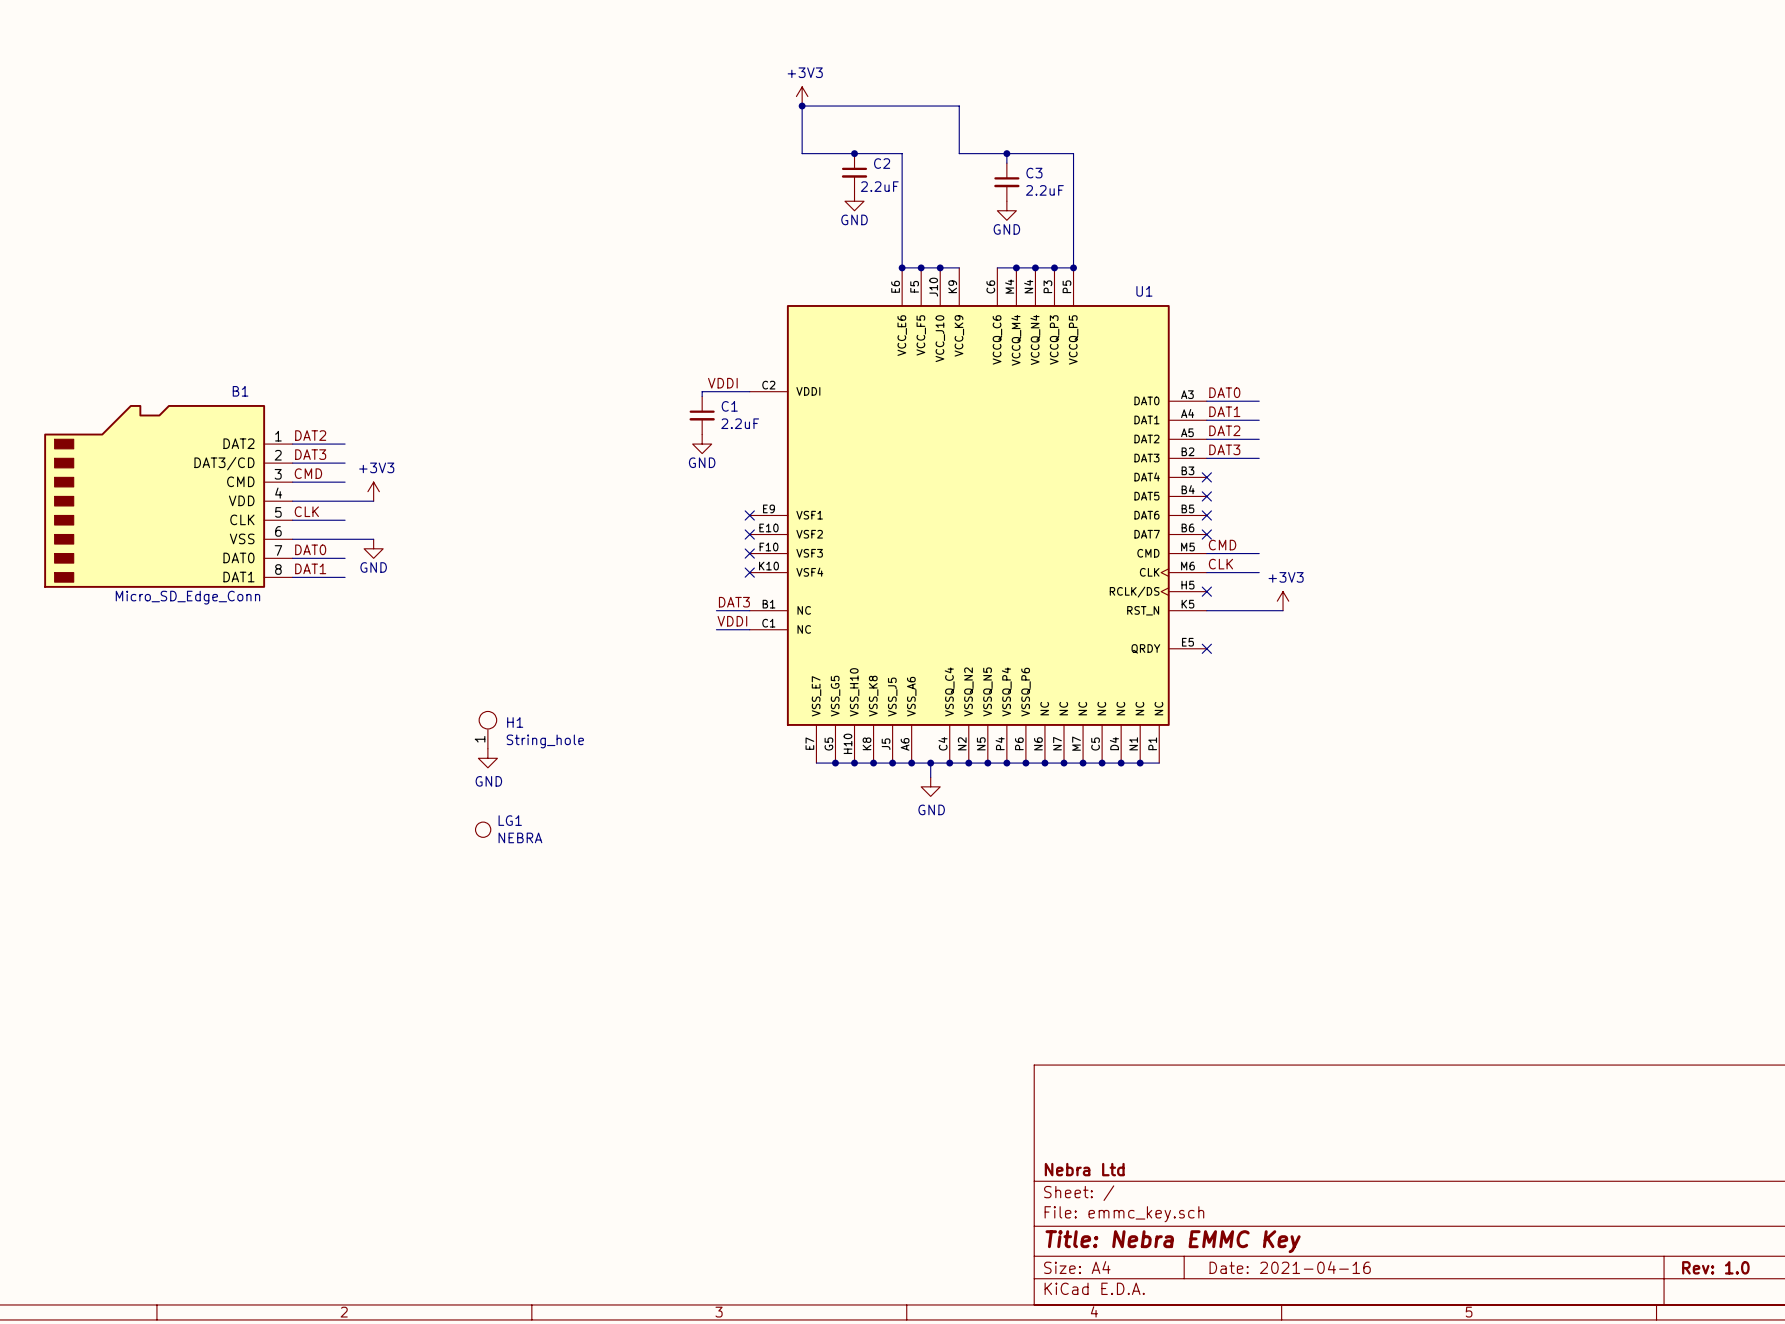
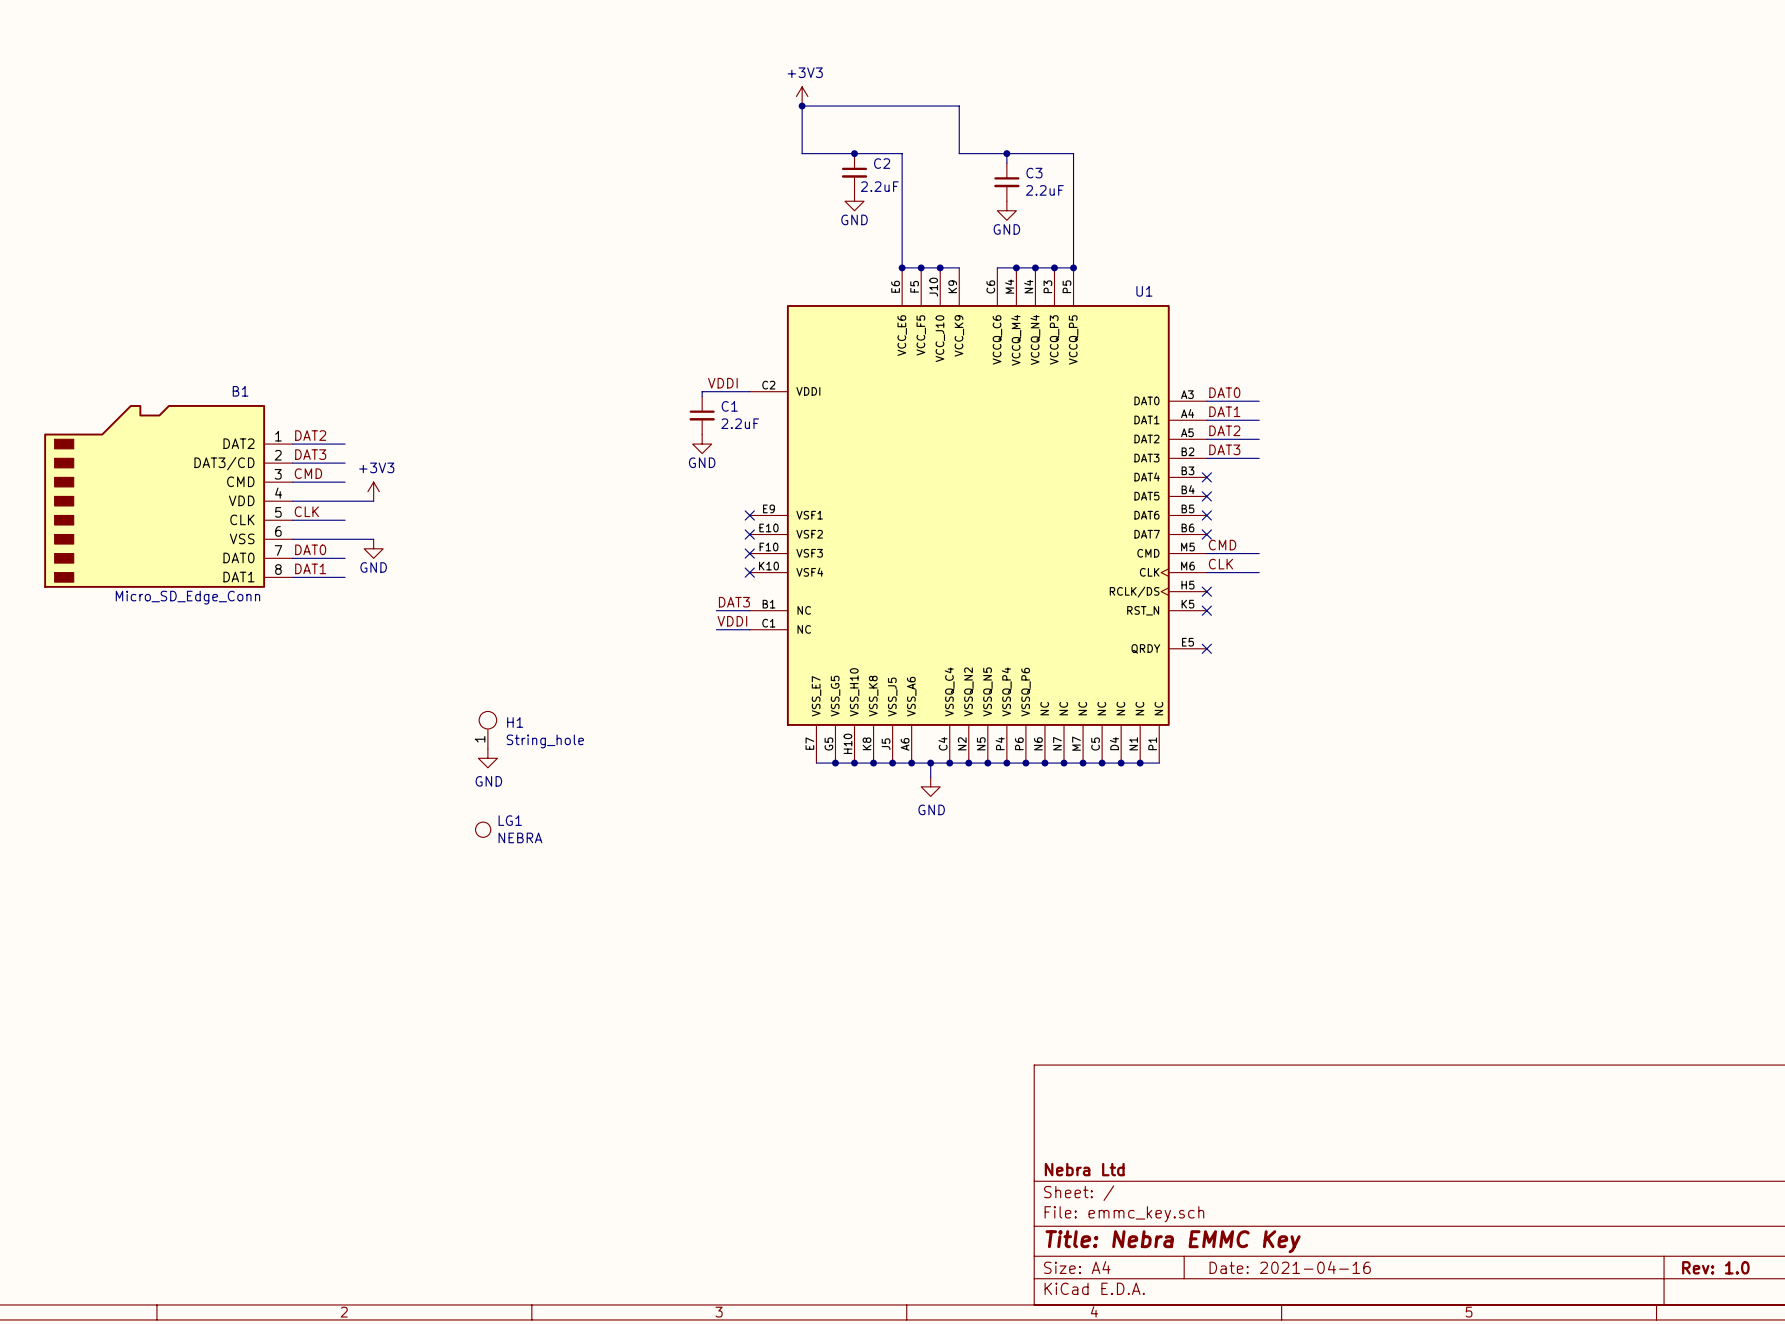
power symbol: +3V3 (1283, 601) -> none
wire: (1206, 610) (1283, 610) -> none
no-connect mark: none -> (1206, 610)

